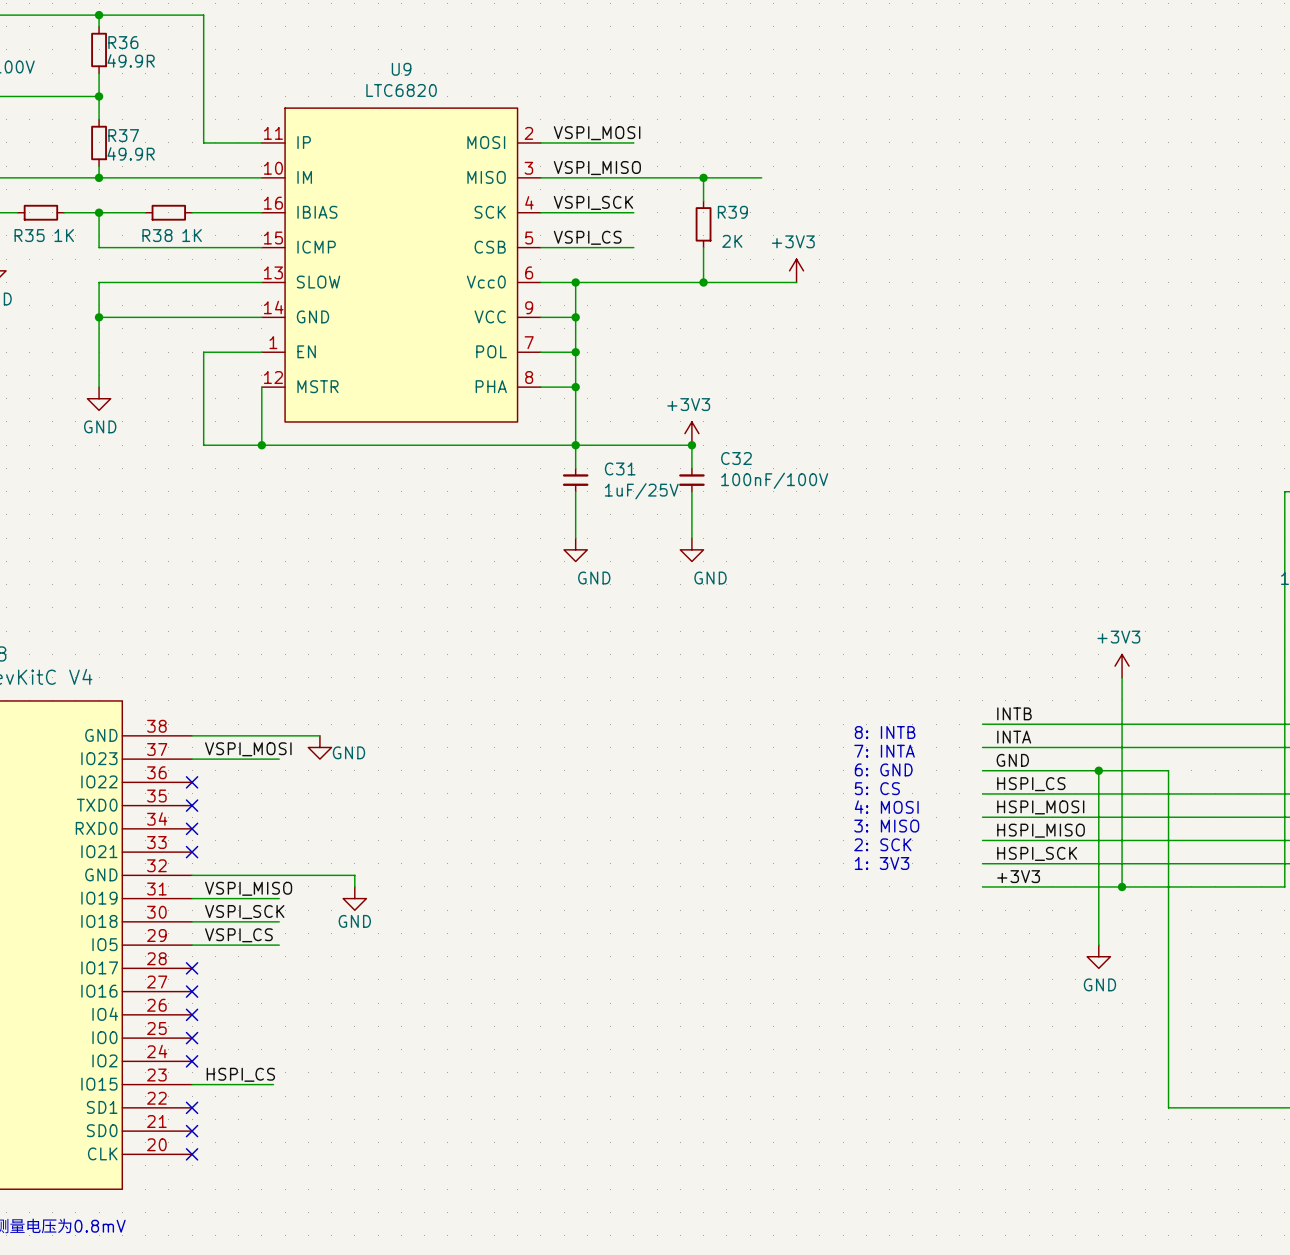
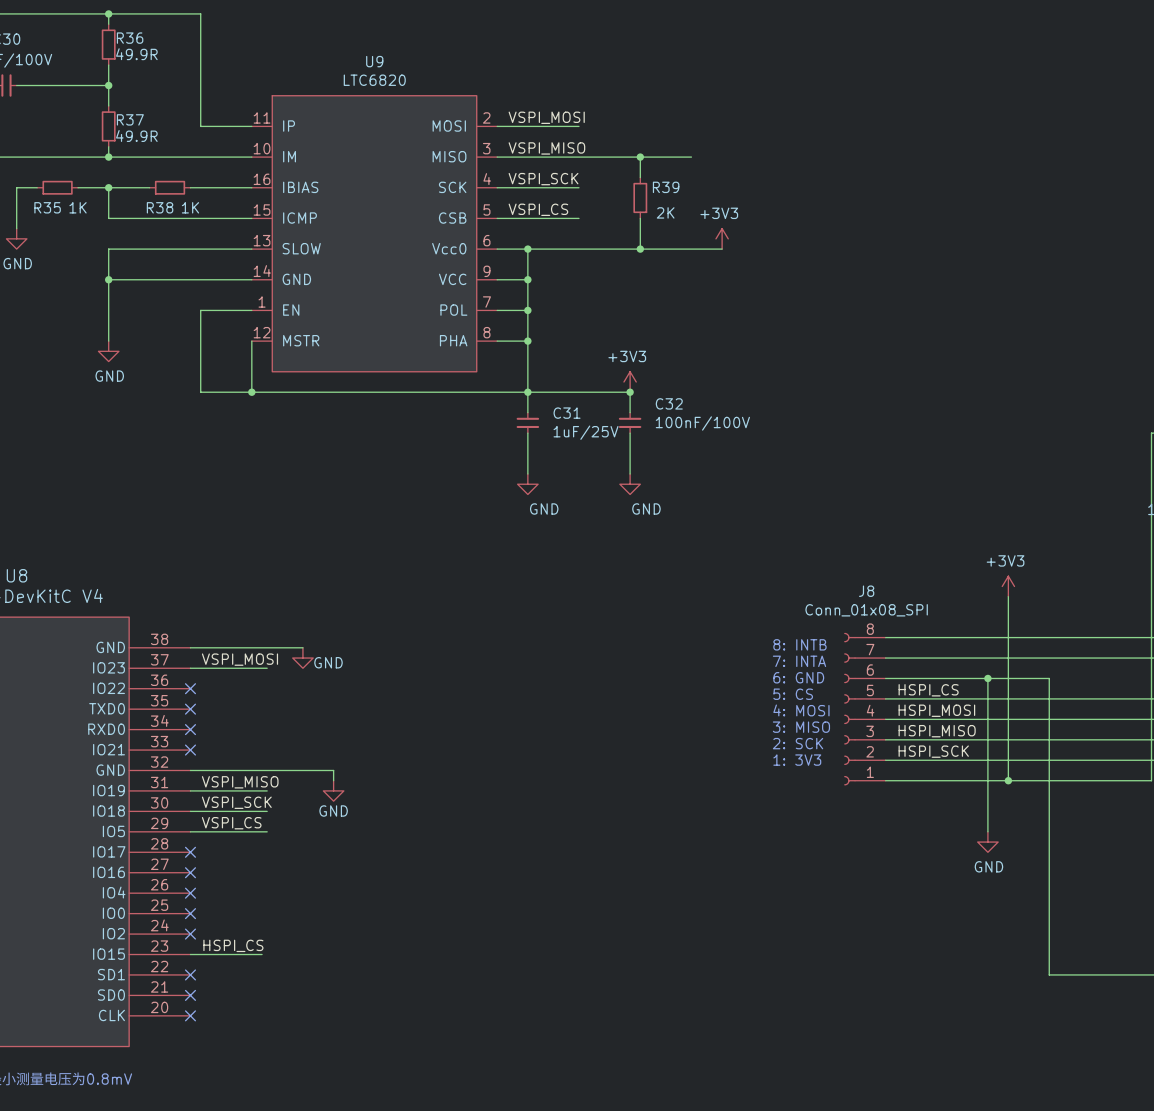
label: INTB (1014, 713) -> none
label: INTA (1014, 737) -> none
label: GND (1012, 760) -> none
J8: none -> Conn_01x08_SPI (864, 709)
label: +3V3 (1018, 876) -> none

